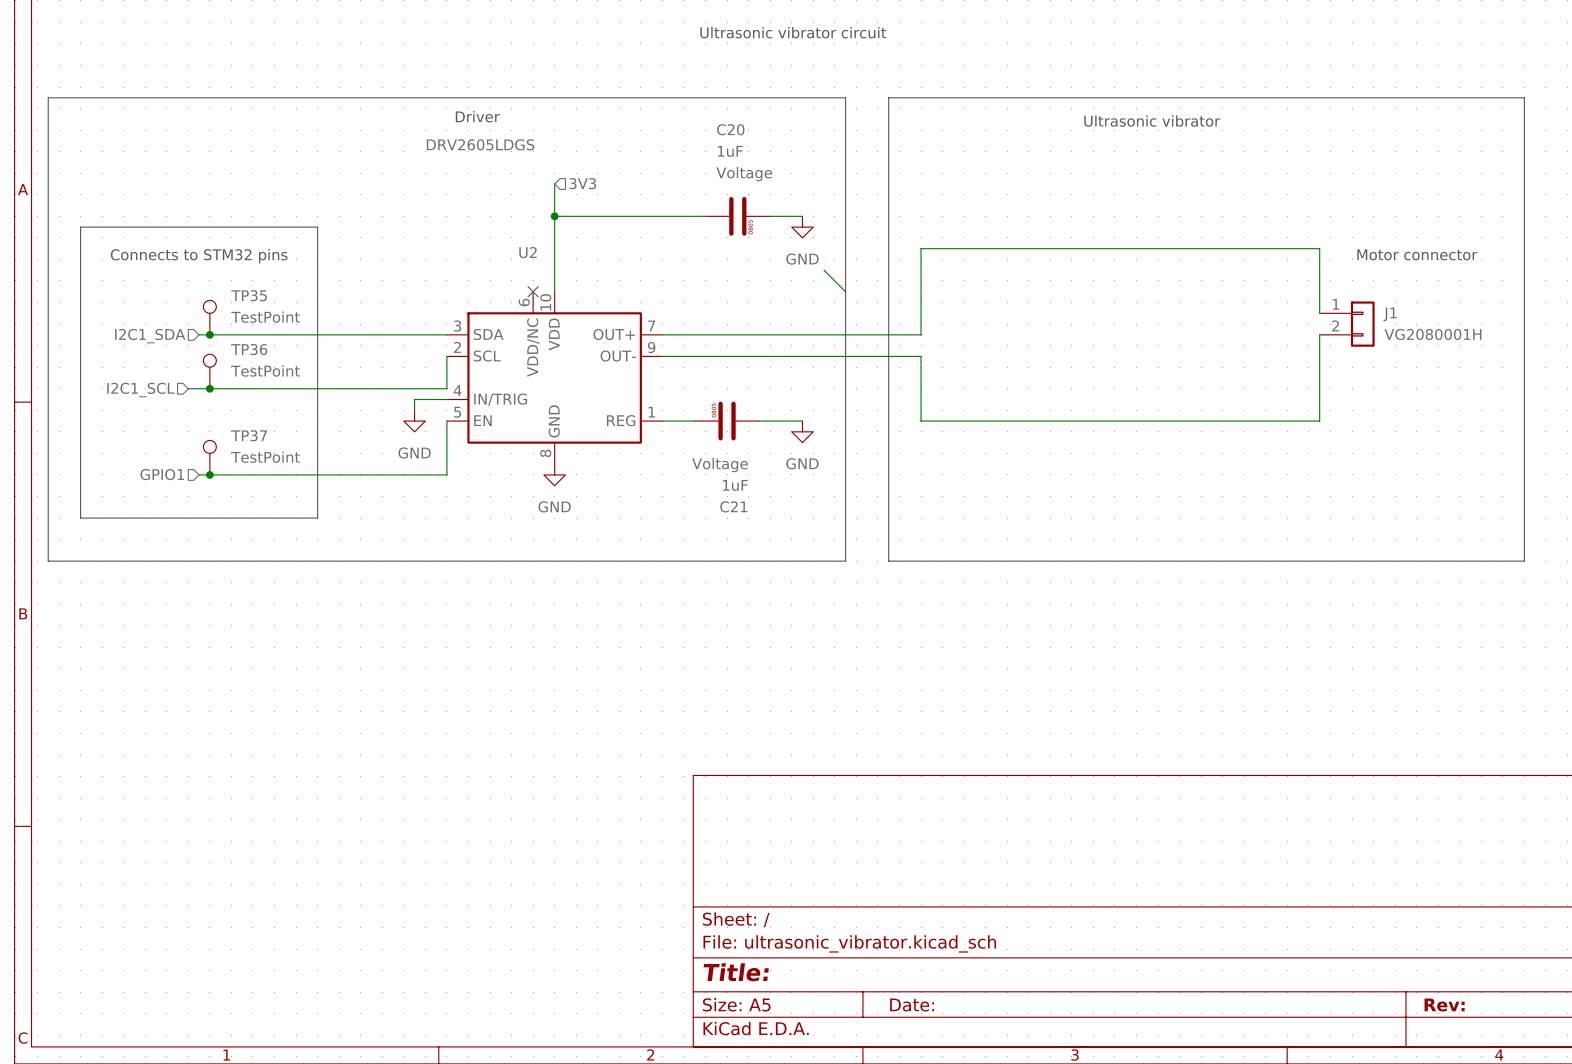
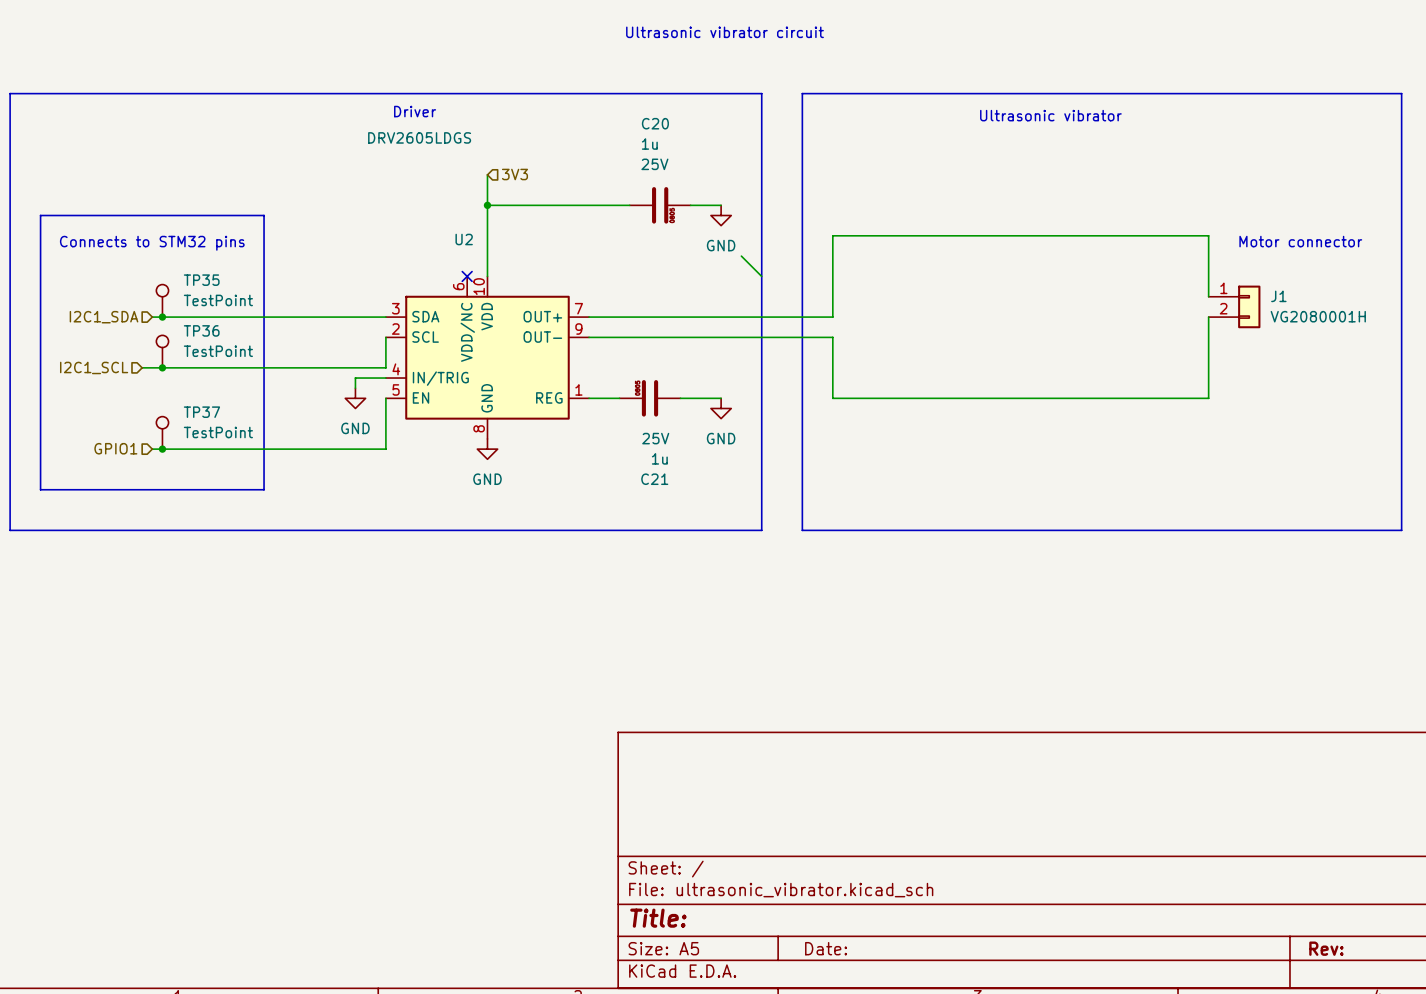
C20 value: 1uF (730, 151) -> 1u (649, 144)
C20 text: Voltage (744, 174) -> 25V (654, 164)
C21 text: Voltage (719, 465) -> 25V (655, 438)
C21 value: 1uF (735, 485) -> 1u (659, 458)

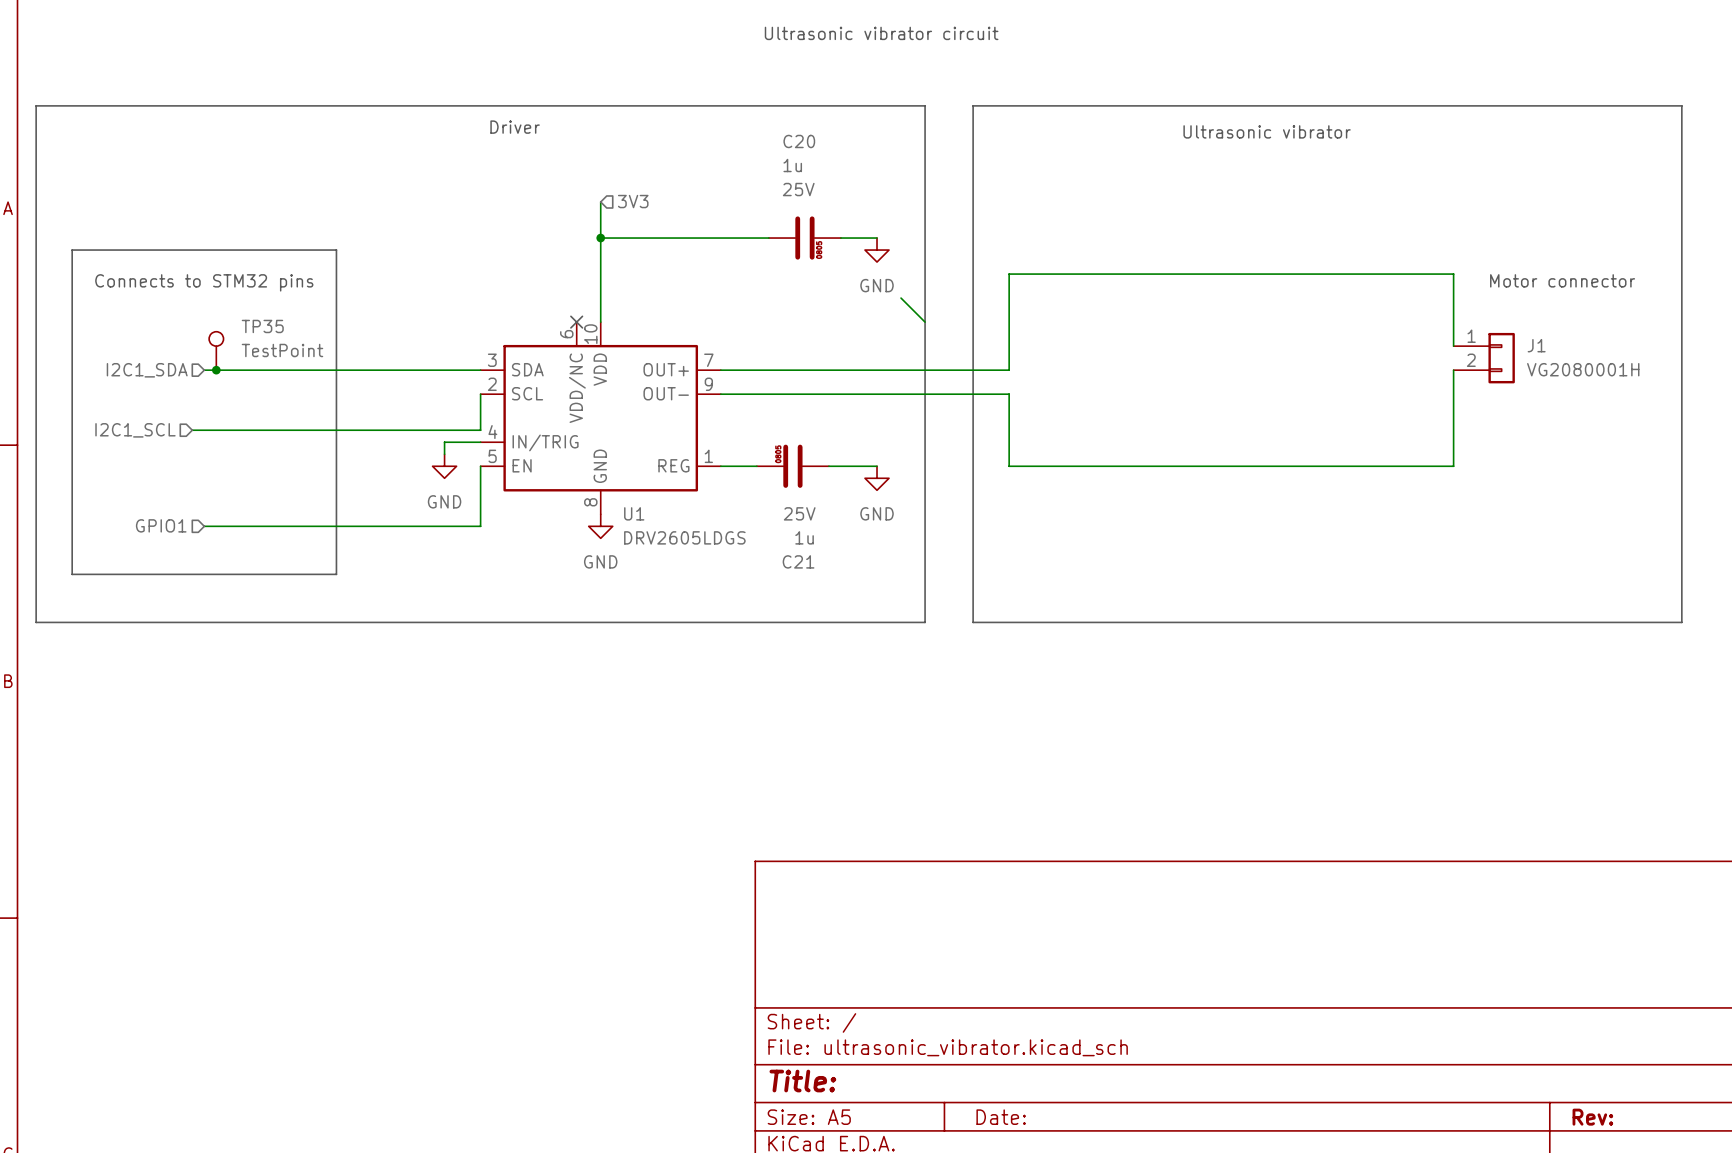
U2 value position: DRV2605LDGS (419, 137) -> DRV2605LDGS (684, 537)
U2 name: U2 (464, 239) -> U1 (634, 513)
TP36: TestPoint (162, 351) -> none
junction: (162, 367) -> none
TP37: TestPoint (162, 432) -> none
junction: (162, 449) -> none

